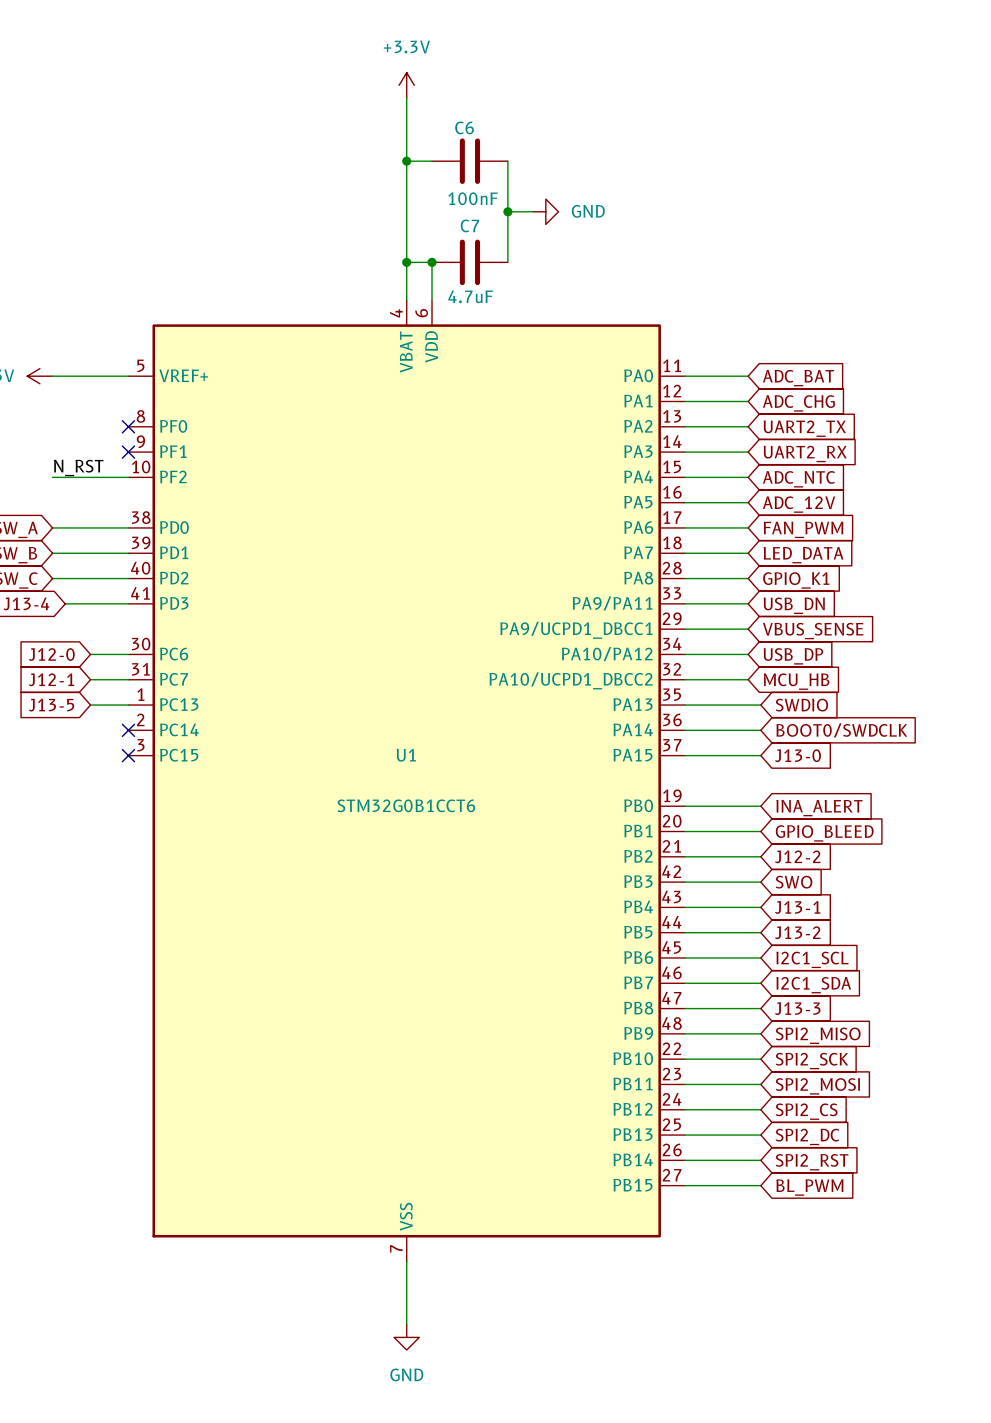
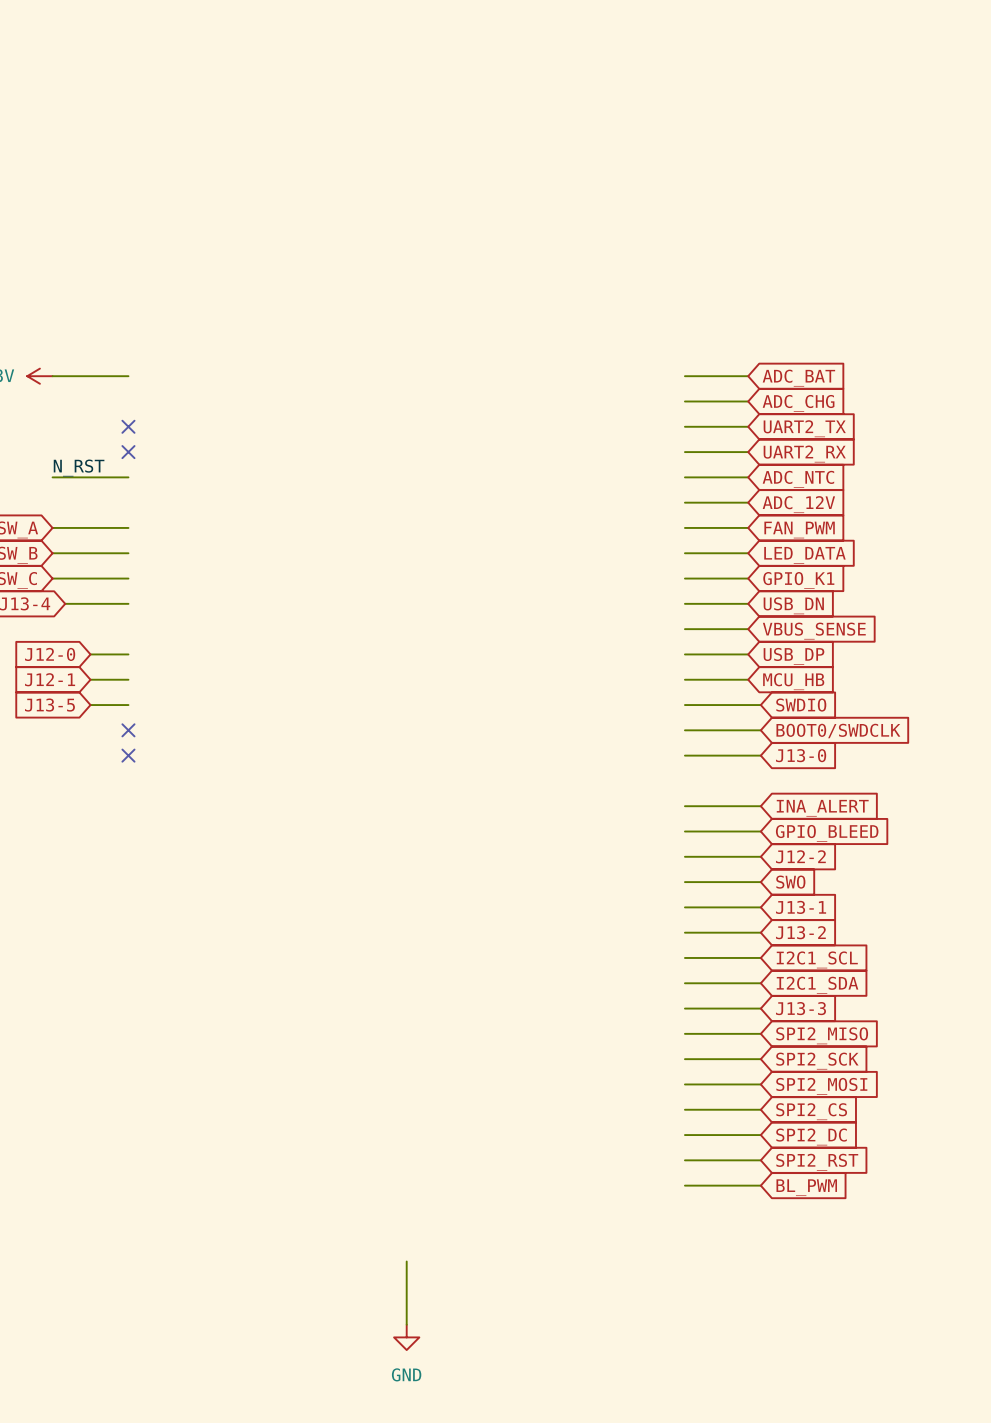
power symbol: +3.3V (406, 85) -> none
wire: (406, 97) (406, 300) -> none
wire: (406, 161) (432, 161) -> none
junction: (406, 161) -> none
C6: 100nF (469, 161) -> none
wire: (507, 161) (507, 262) -> none
wire: (507, 211) (533, 211) -> none
junction: (507, 211) -> none
power symbol: GND (545, 211) -> none
wire: (406, 262) (432, 262) (432, 300) -> none
junction: (406, 262) -> none
junction: (432, 262) -> none
C7: 4.7uF (469, 262) -> none
U1: STM32G0B1CCT6 (406, 780) -> none

